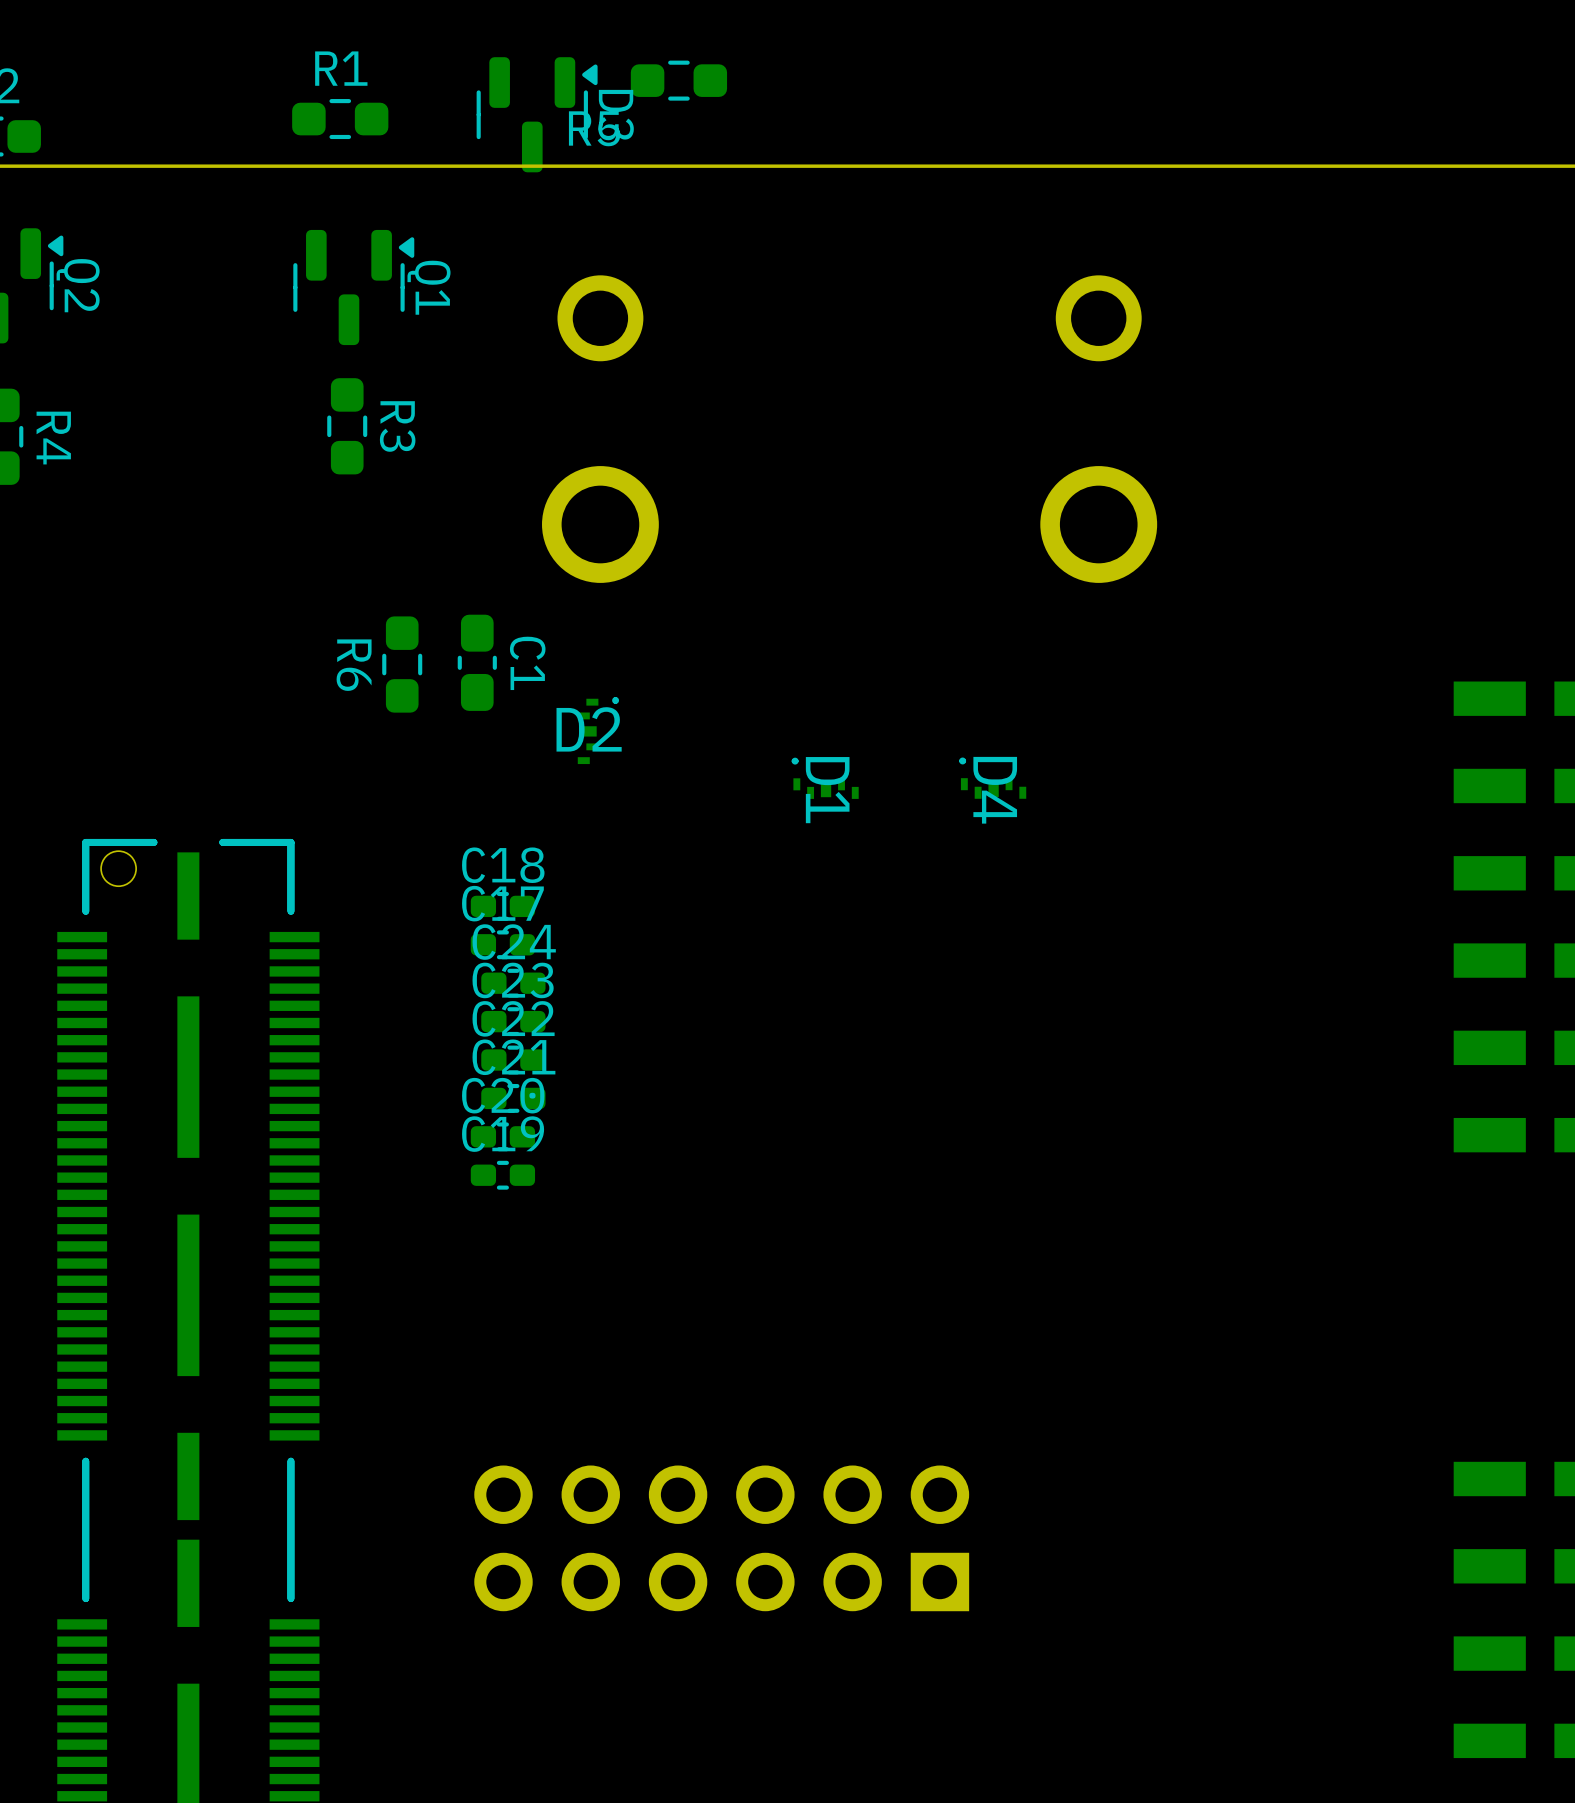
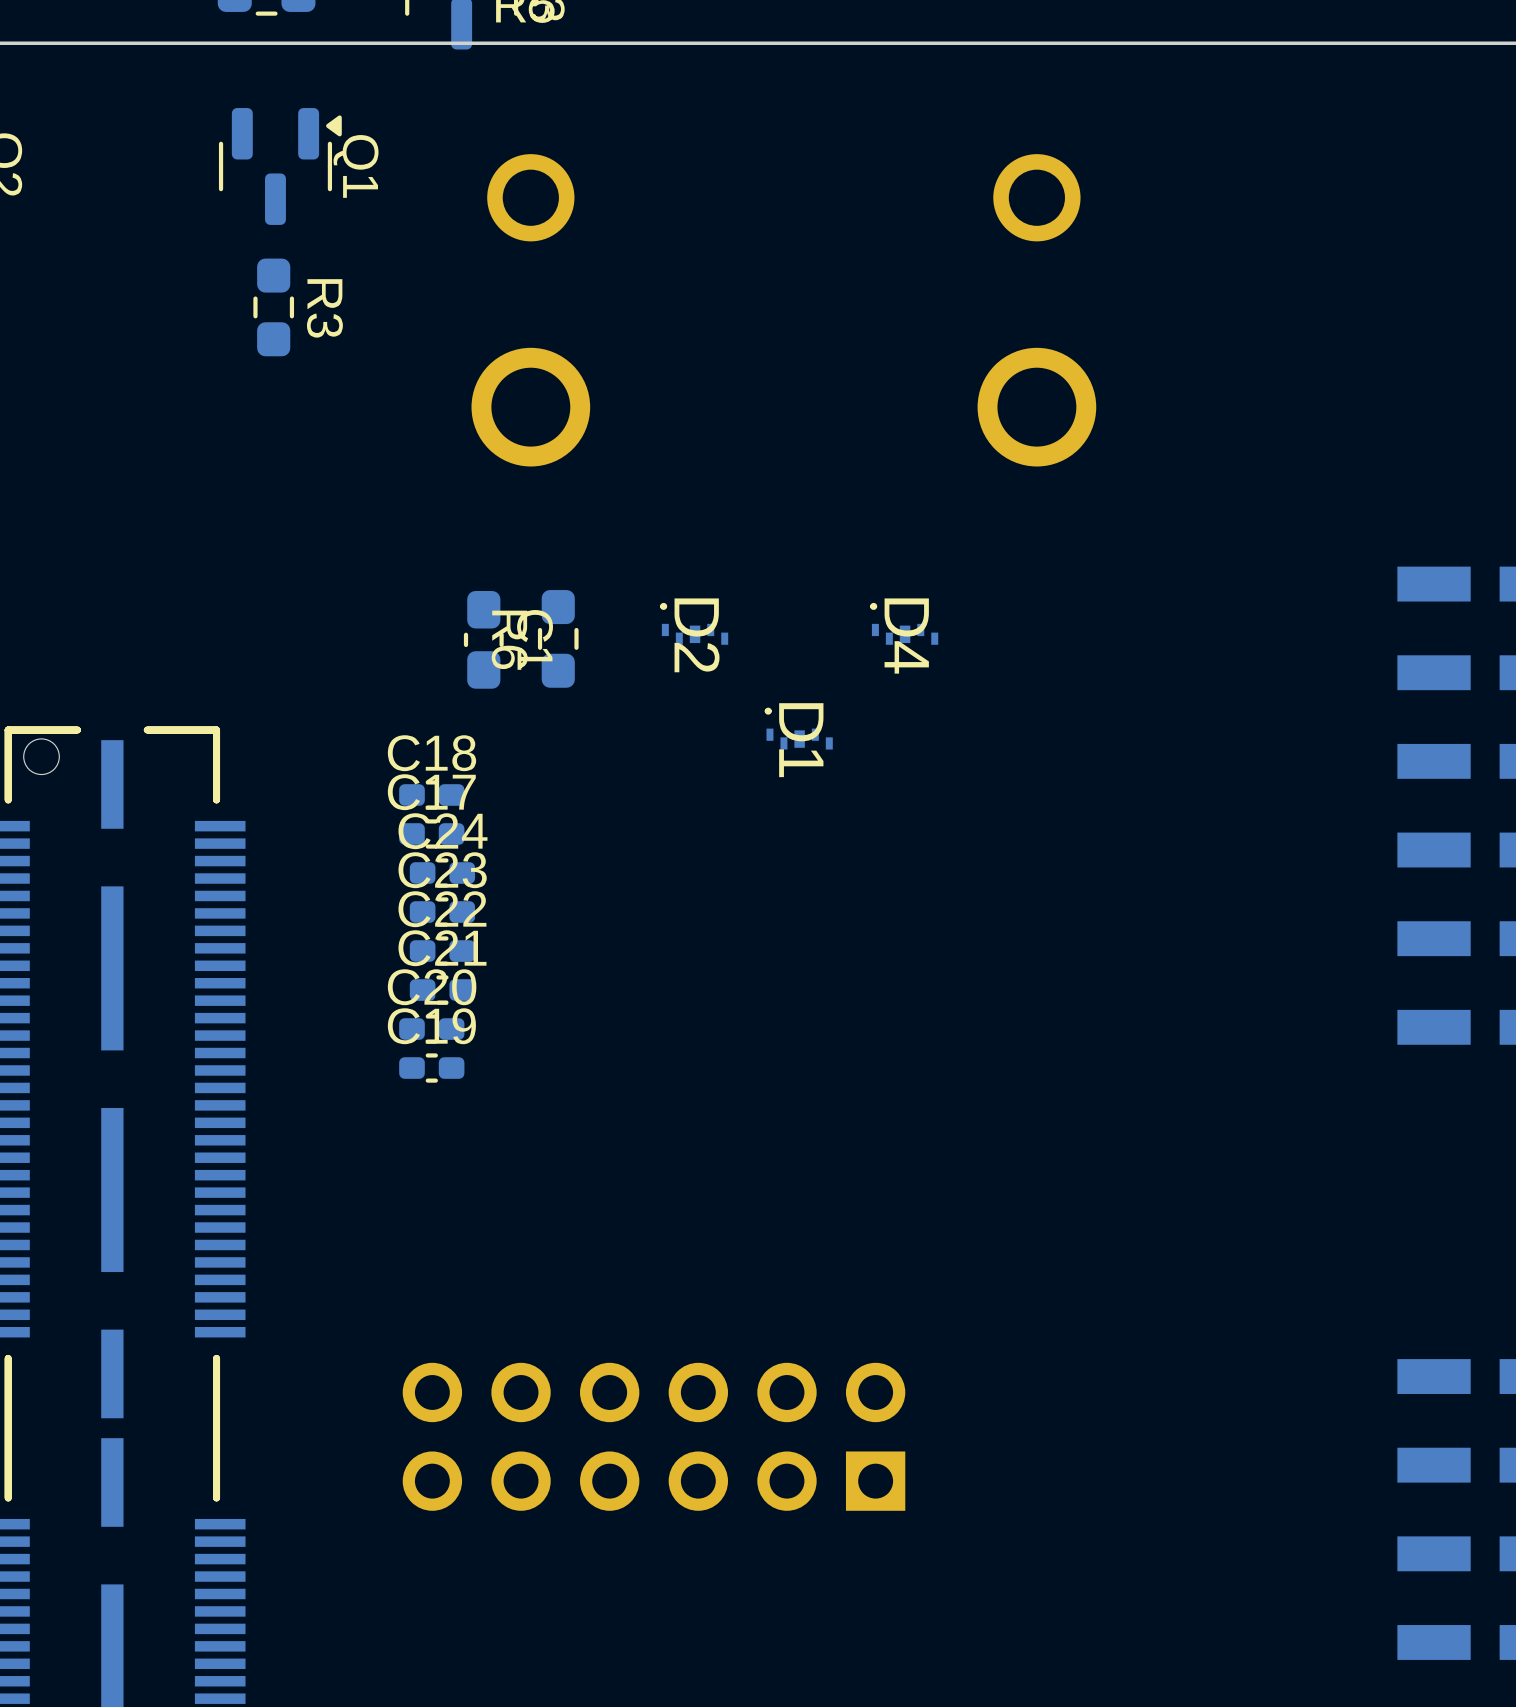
C1 position: (477, 662) -> (483, 639)
R6 position: (402, 664) -> (558, 638)
D2 rotation: 0° (598, 730) -> 90° counterclockwise (694, 623)
D2 position: (598, 730) -> (694, 623)
D1 position: (825, 778) -> (798, 728)
D4 position: (992, 778) -> (904, 623)

